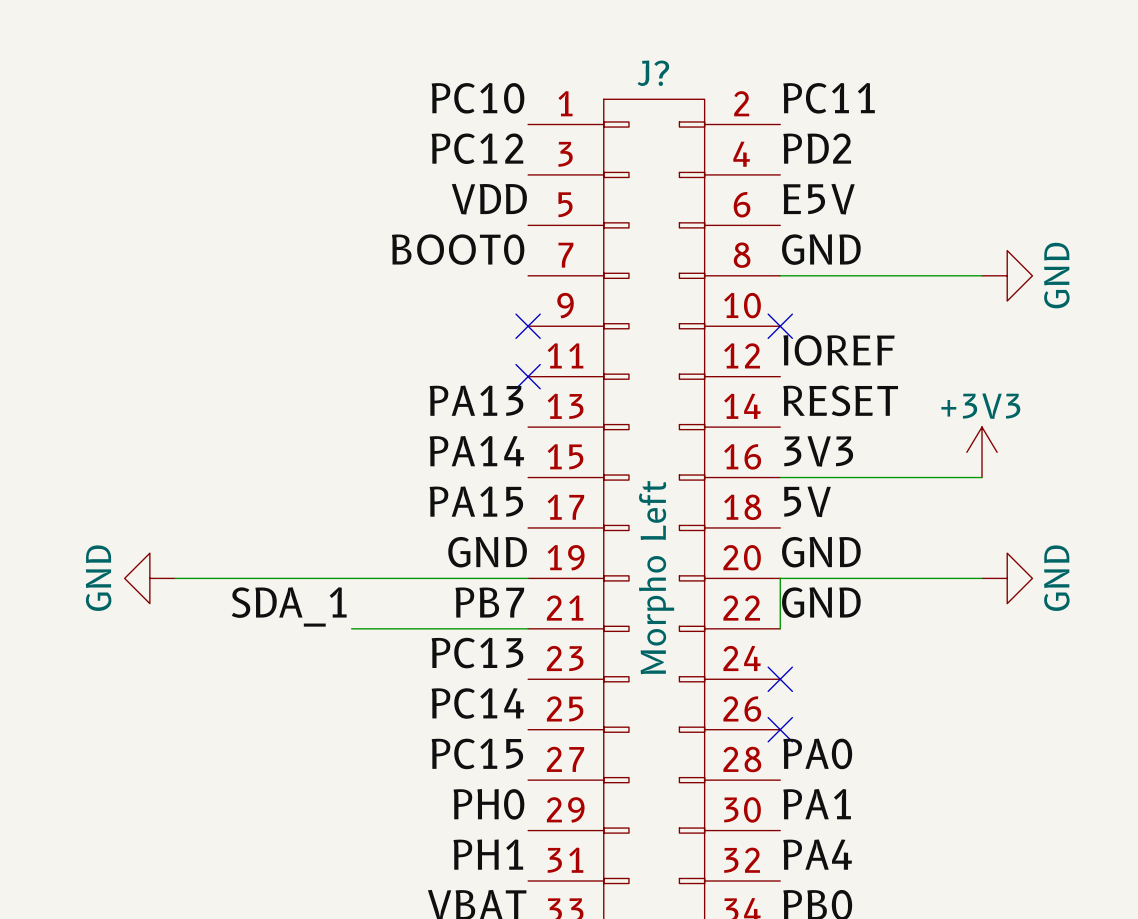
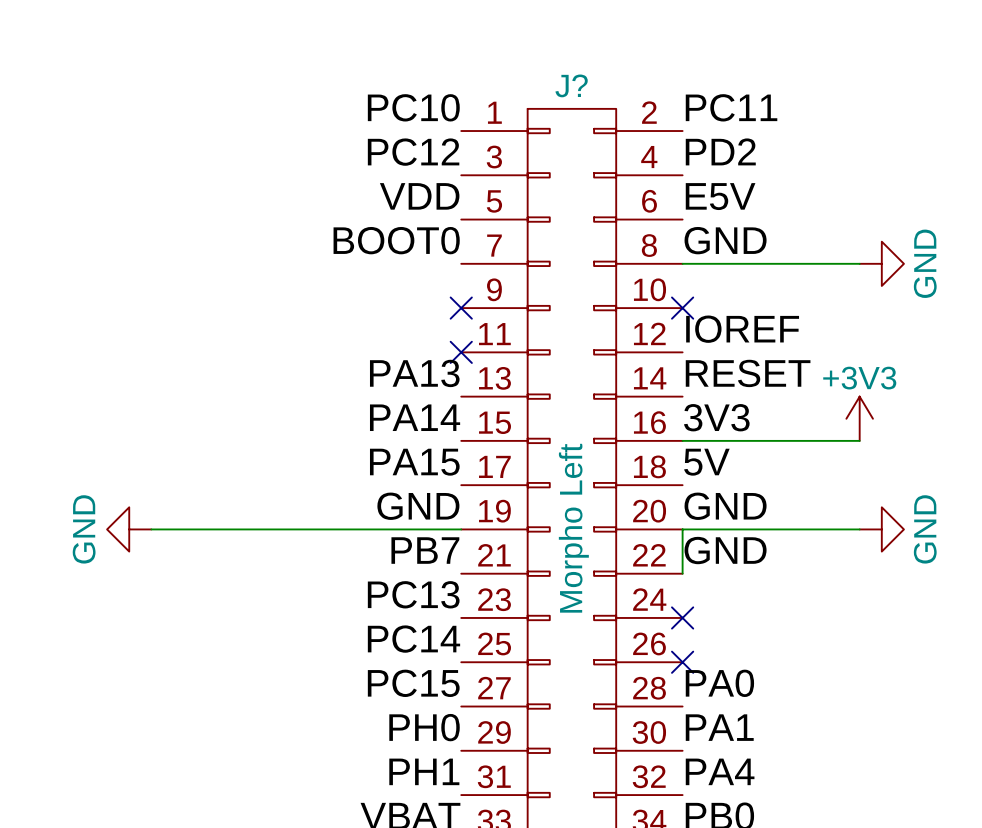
label: SDA_1 (289, 606) -> none
wire: (351, 628) (528, 628) -> none

